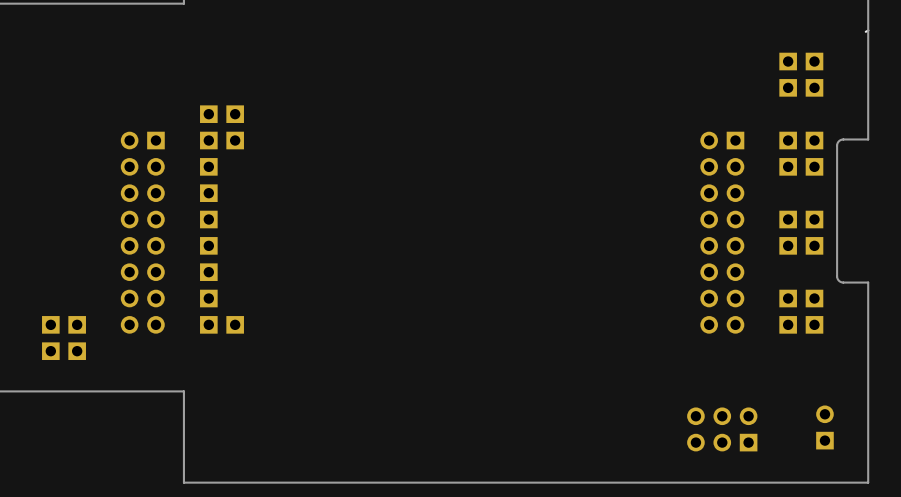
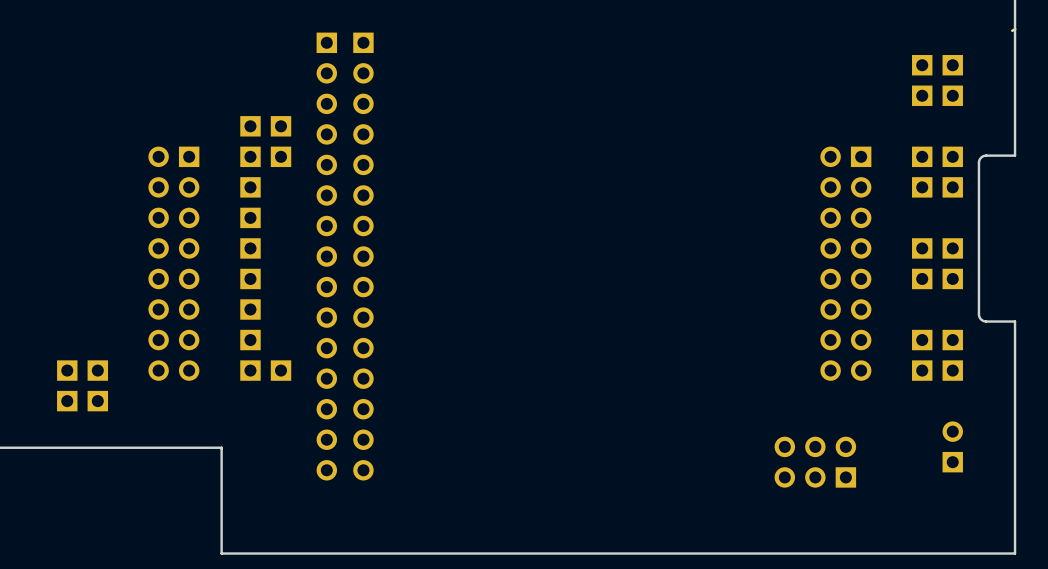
part: none -> (326, 256)
part: none -> (363, 256)
part position: (824, 427) -> (952, 446)
part position: (722, 429) -> (815, 462)

